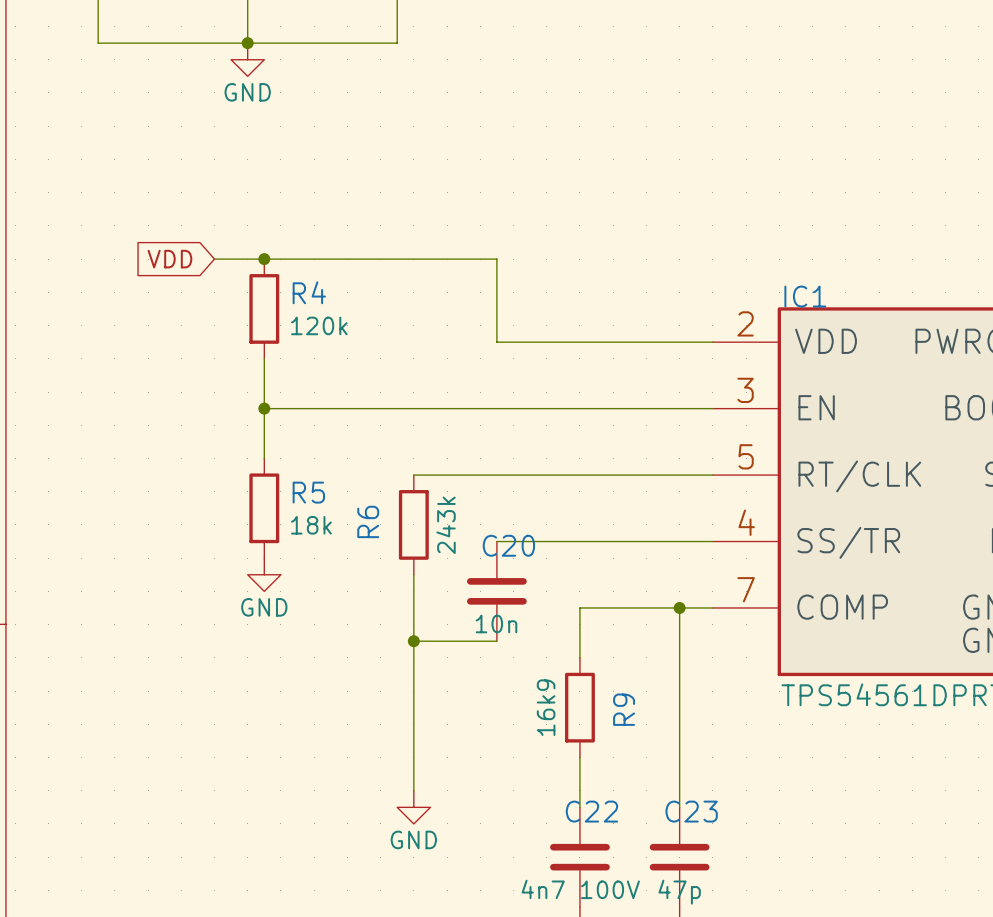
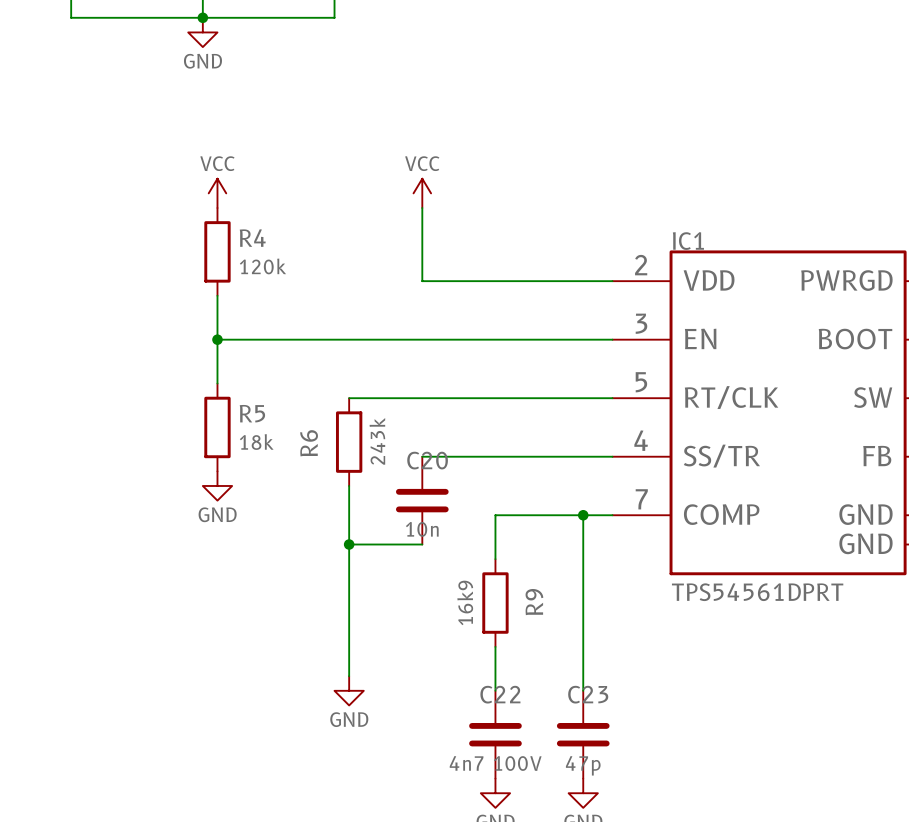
power symbol: none -> VCC (217, 193)
power symbol: none -> VCC (422, 193)
global label: VDD (169, 259) -> none
wire: (214, 259) (496, 259) -> none
junction: (264, 259) -> none

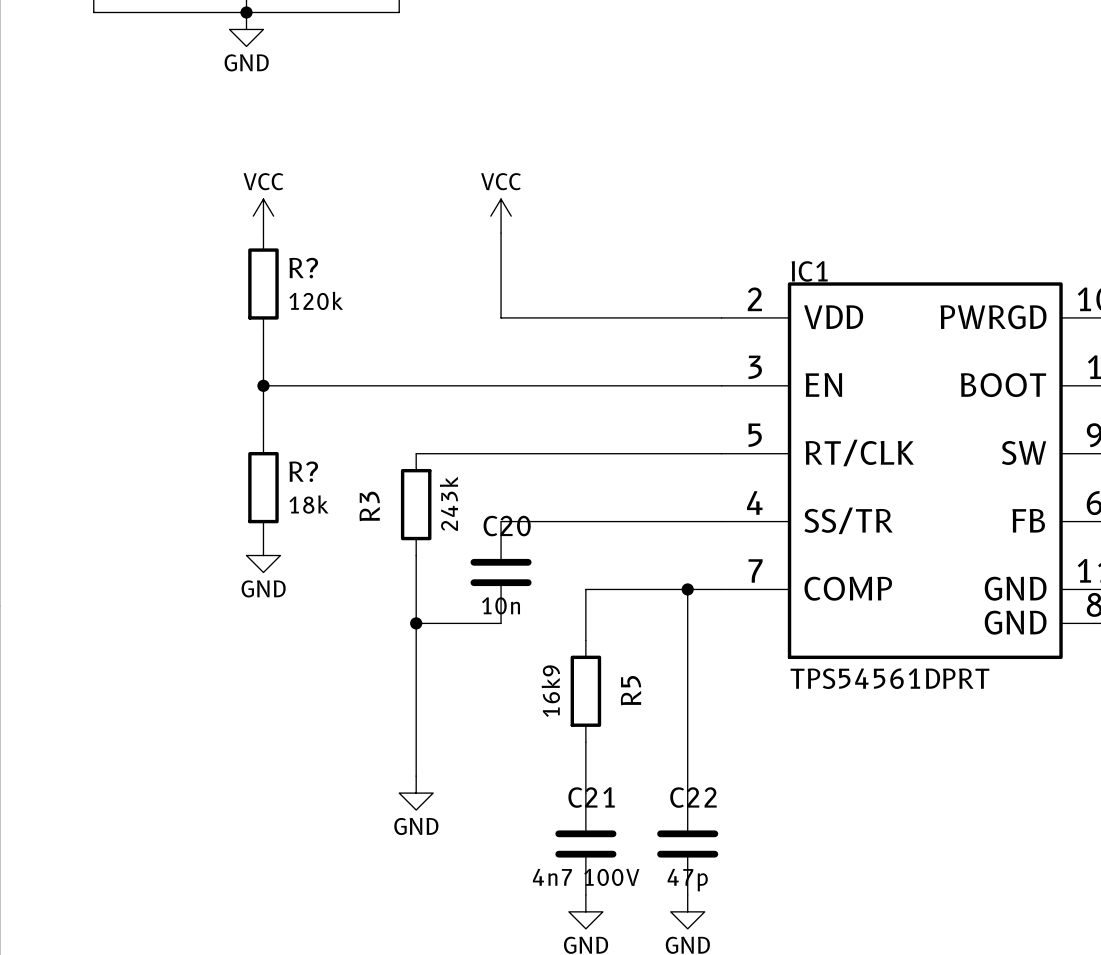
R4 name: R4 (252, 238) -> R? (303, 268)
R5 name: R5 (252, 413) -> R? (303, 471)
R6 name: R6 (309, 443) -> R3 (369, 506)
R9 name: R9 (534, 602) -> R5 (630, 690)
C22 name: C22 (500, 694) -> C21 (591, 797)
C23 name: C23 (588, 694) -> C22 (693, 797)

